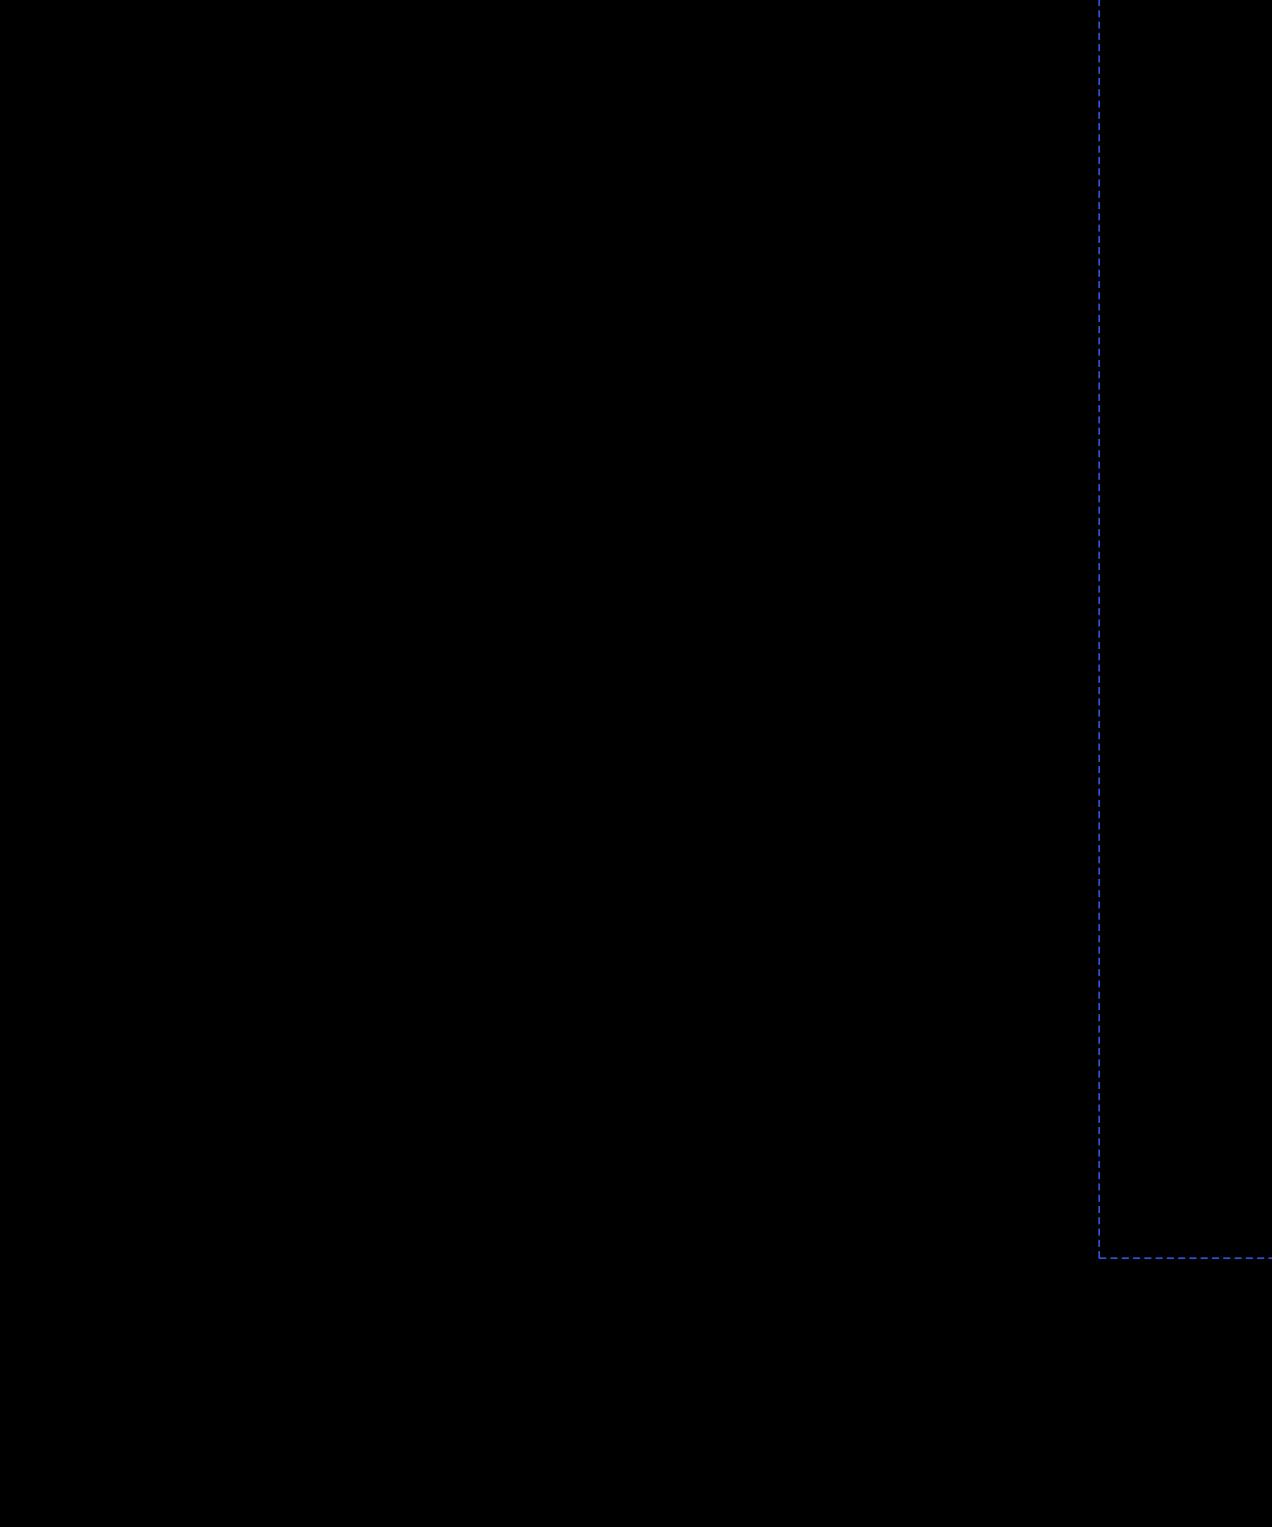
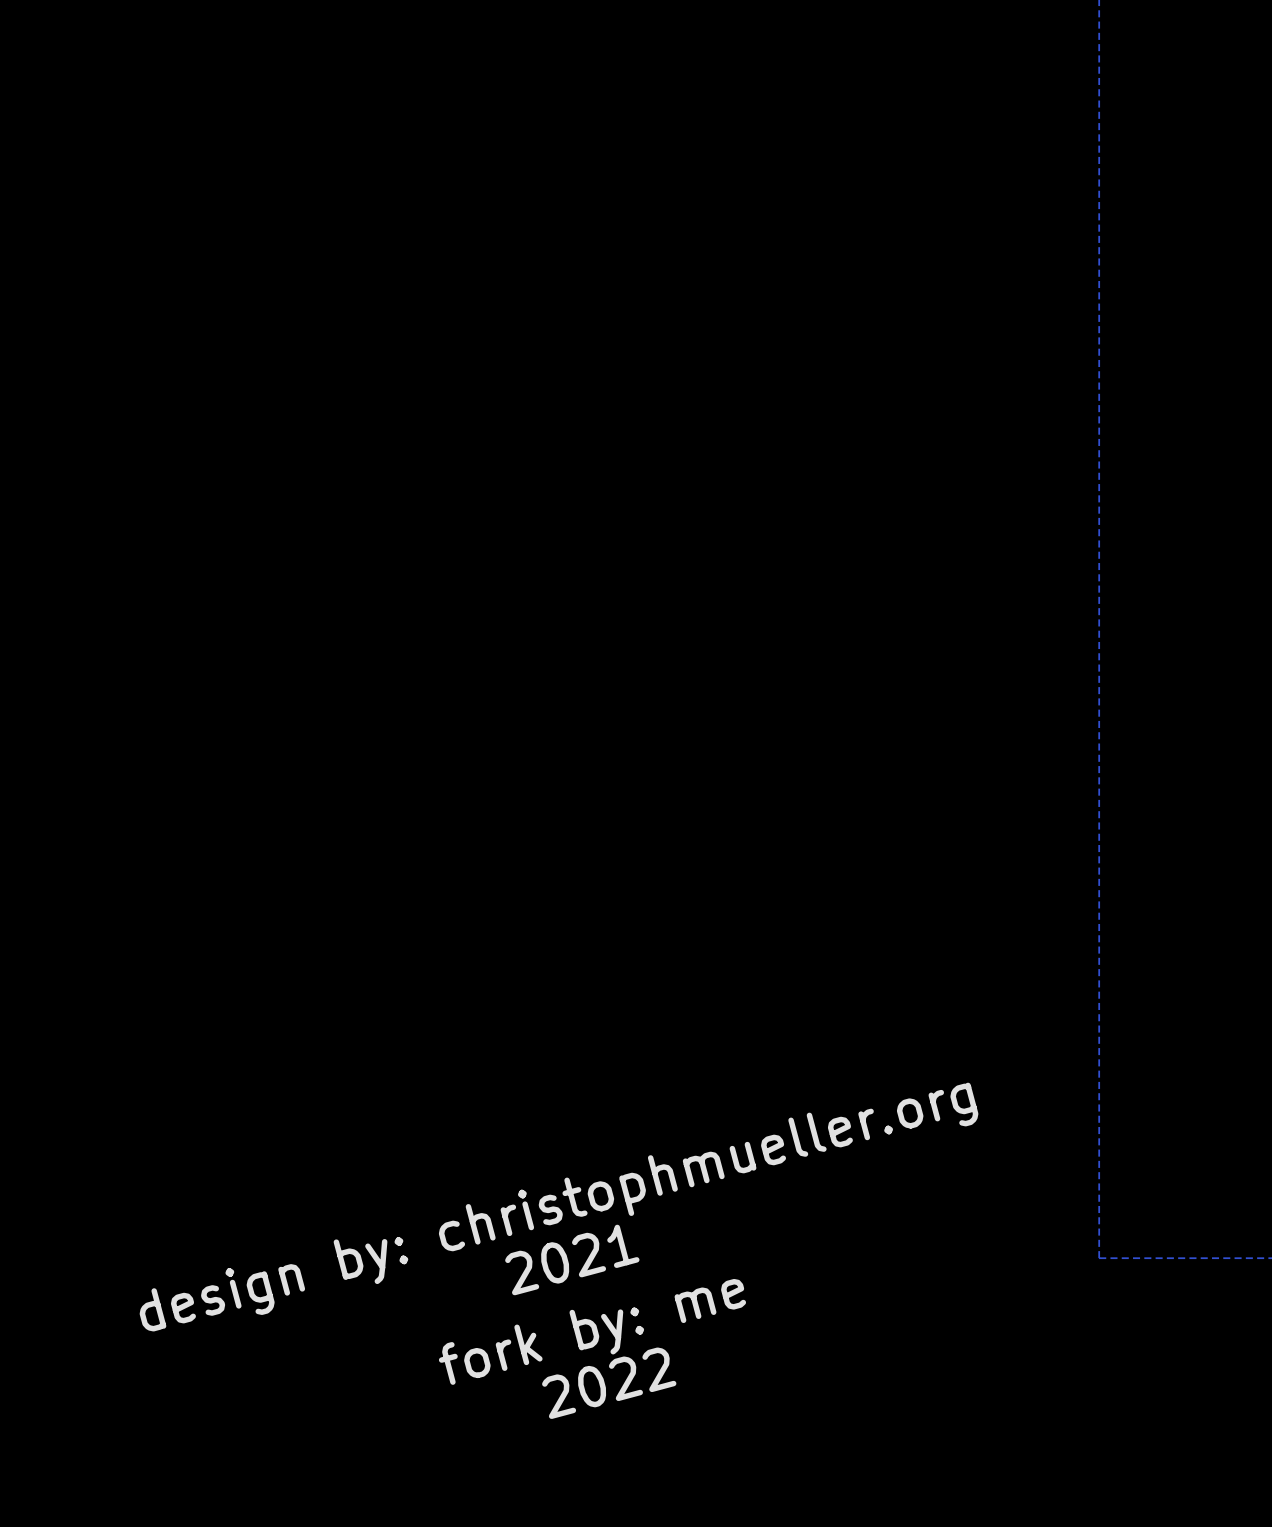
text: none -> design by: christophmueller.org (559, 1207)
text: none -> 2021 (572, 1259)
text: none -> fork by: me (592, 1331)
text: none -> 2022 (609, 1383)

